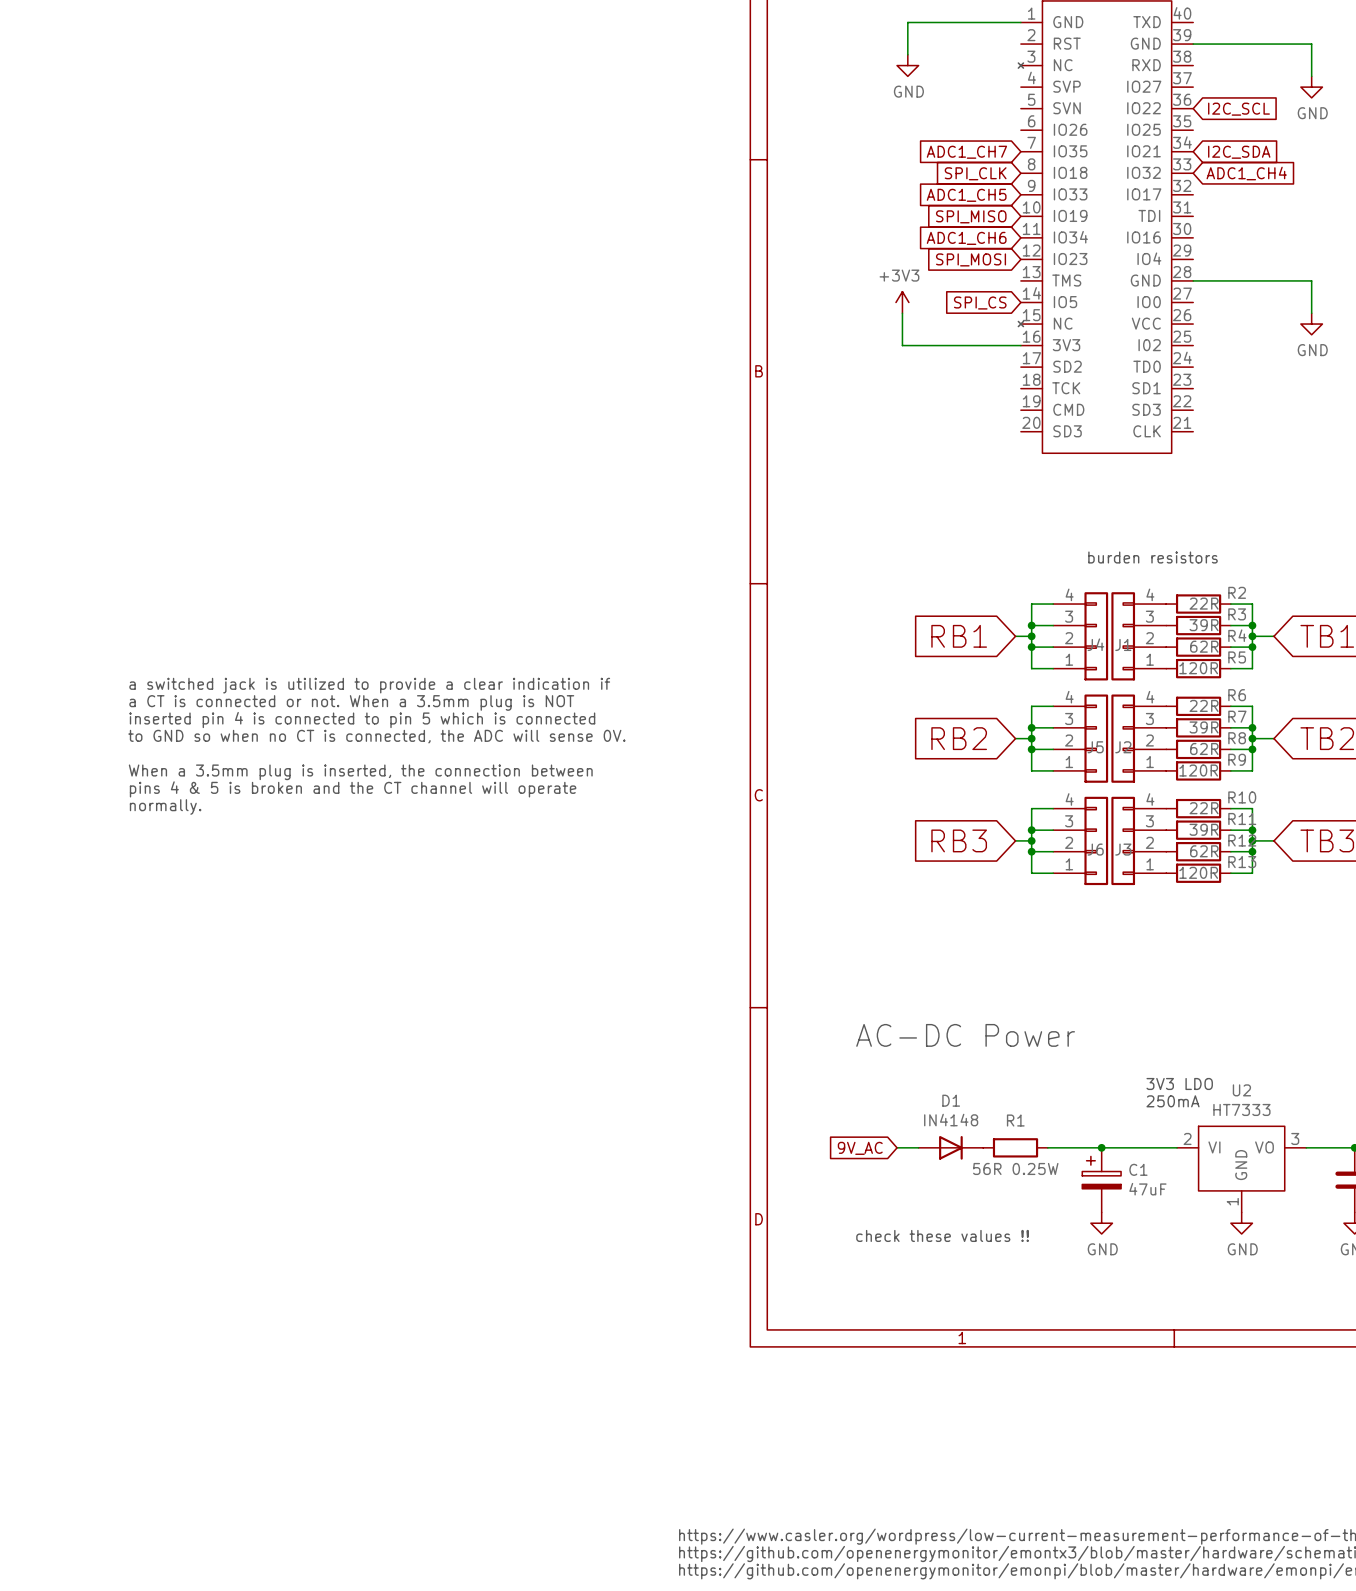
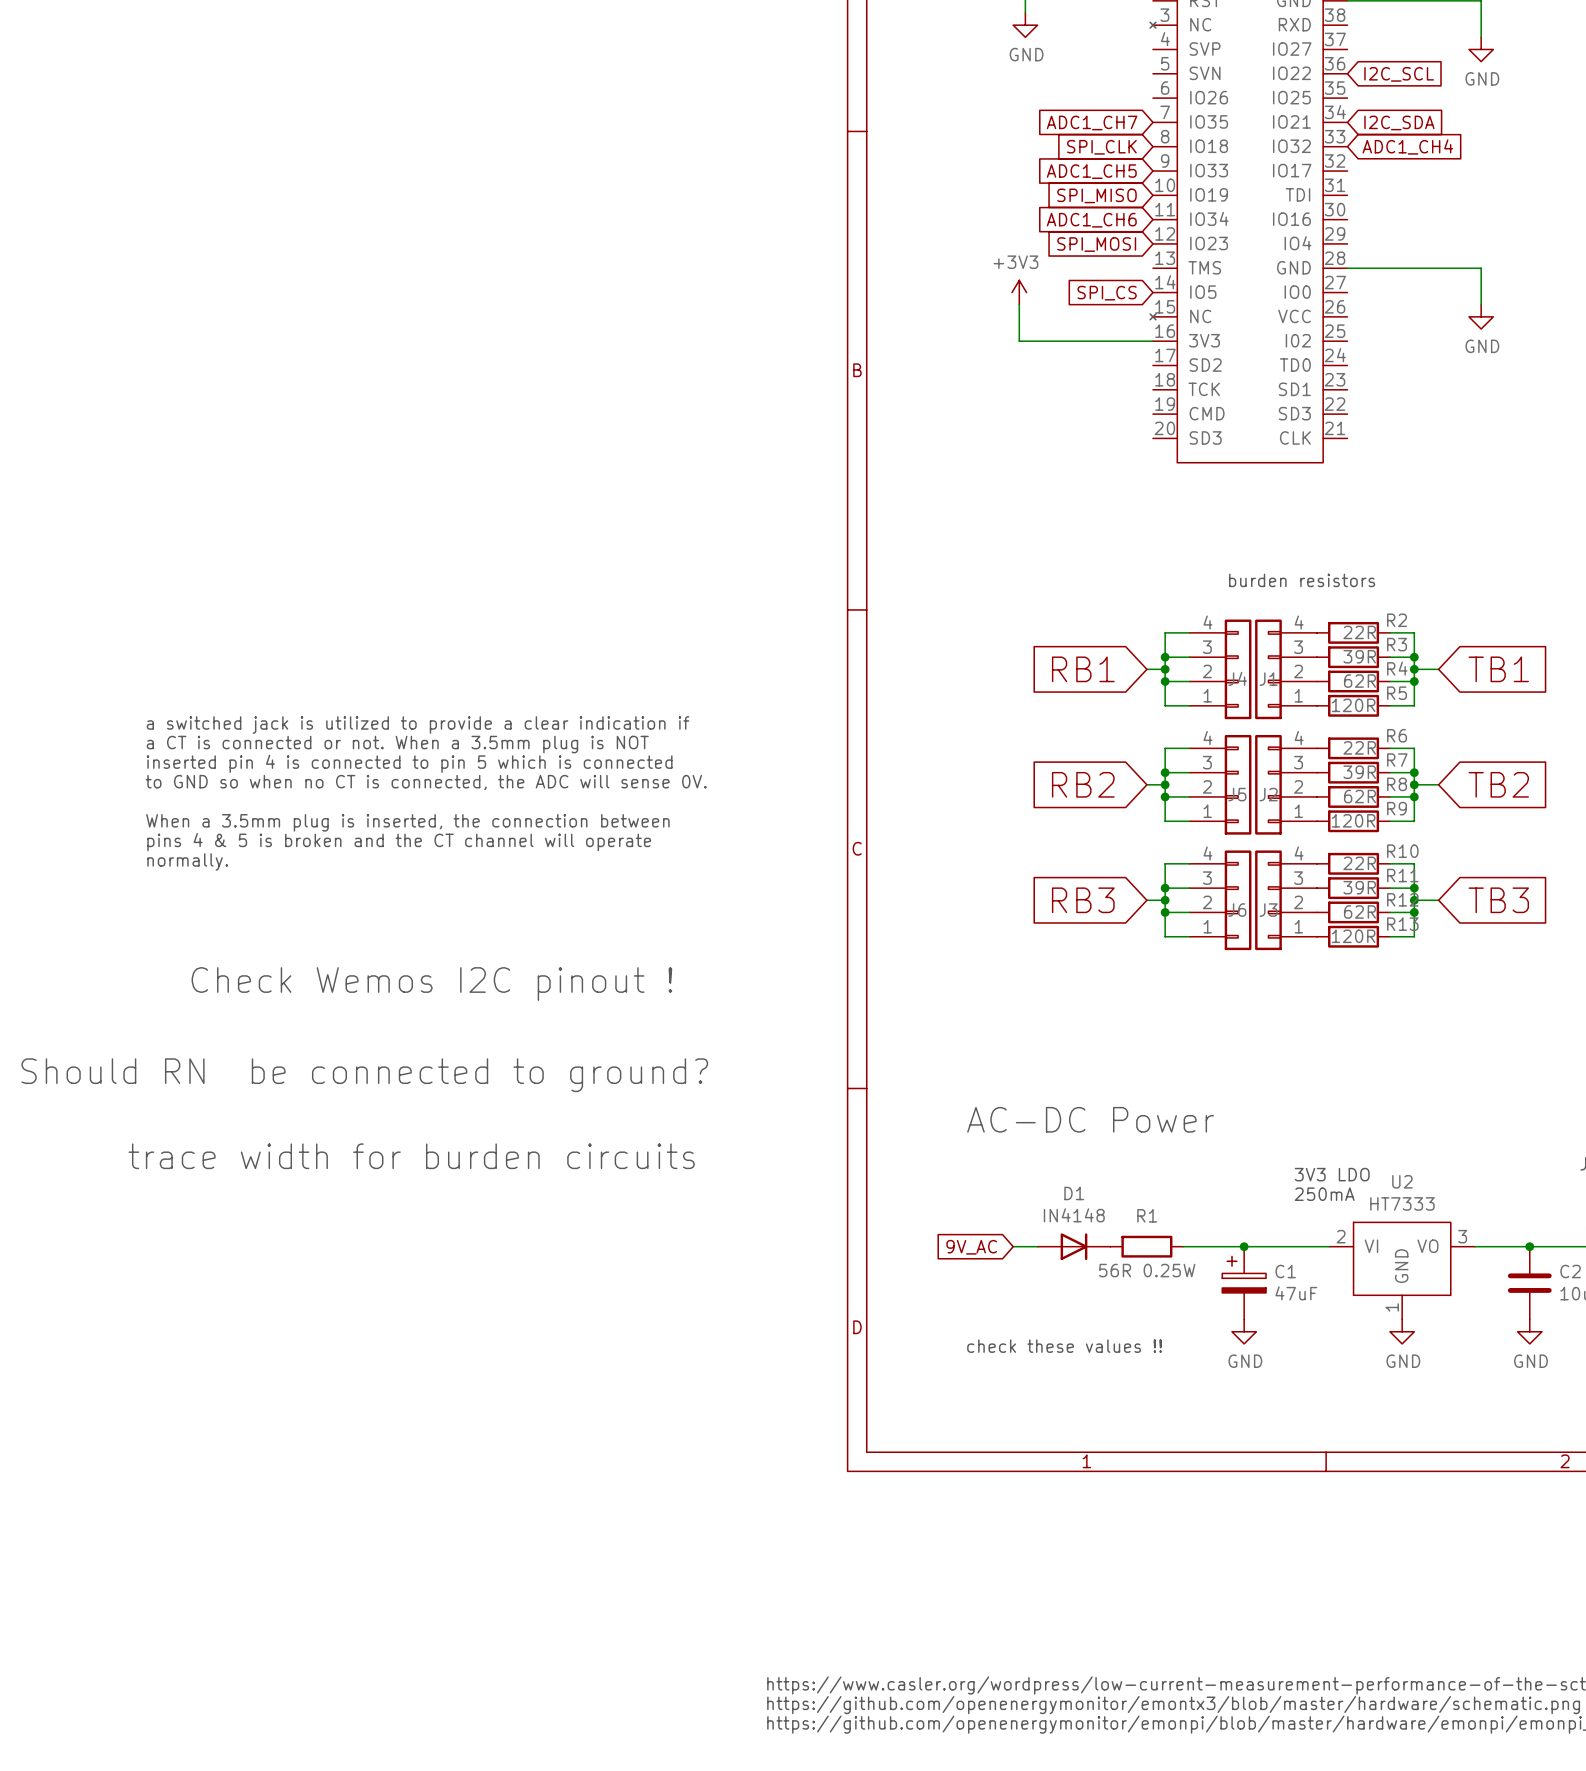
text: none -> Check Wemos I2C pinout ! (431, 984)
text: none -> Should RN be connected to ground? (364, 1075)
text: none -> trace width for burden circuits (411, 1156)

